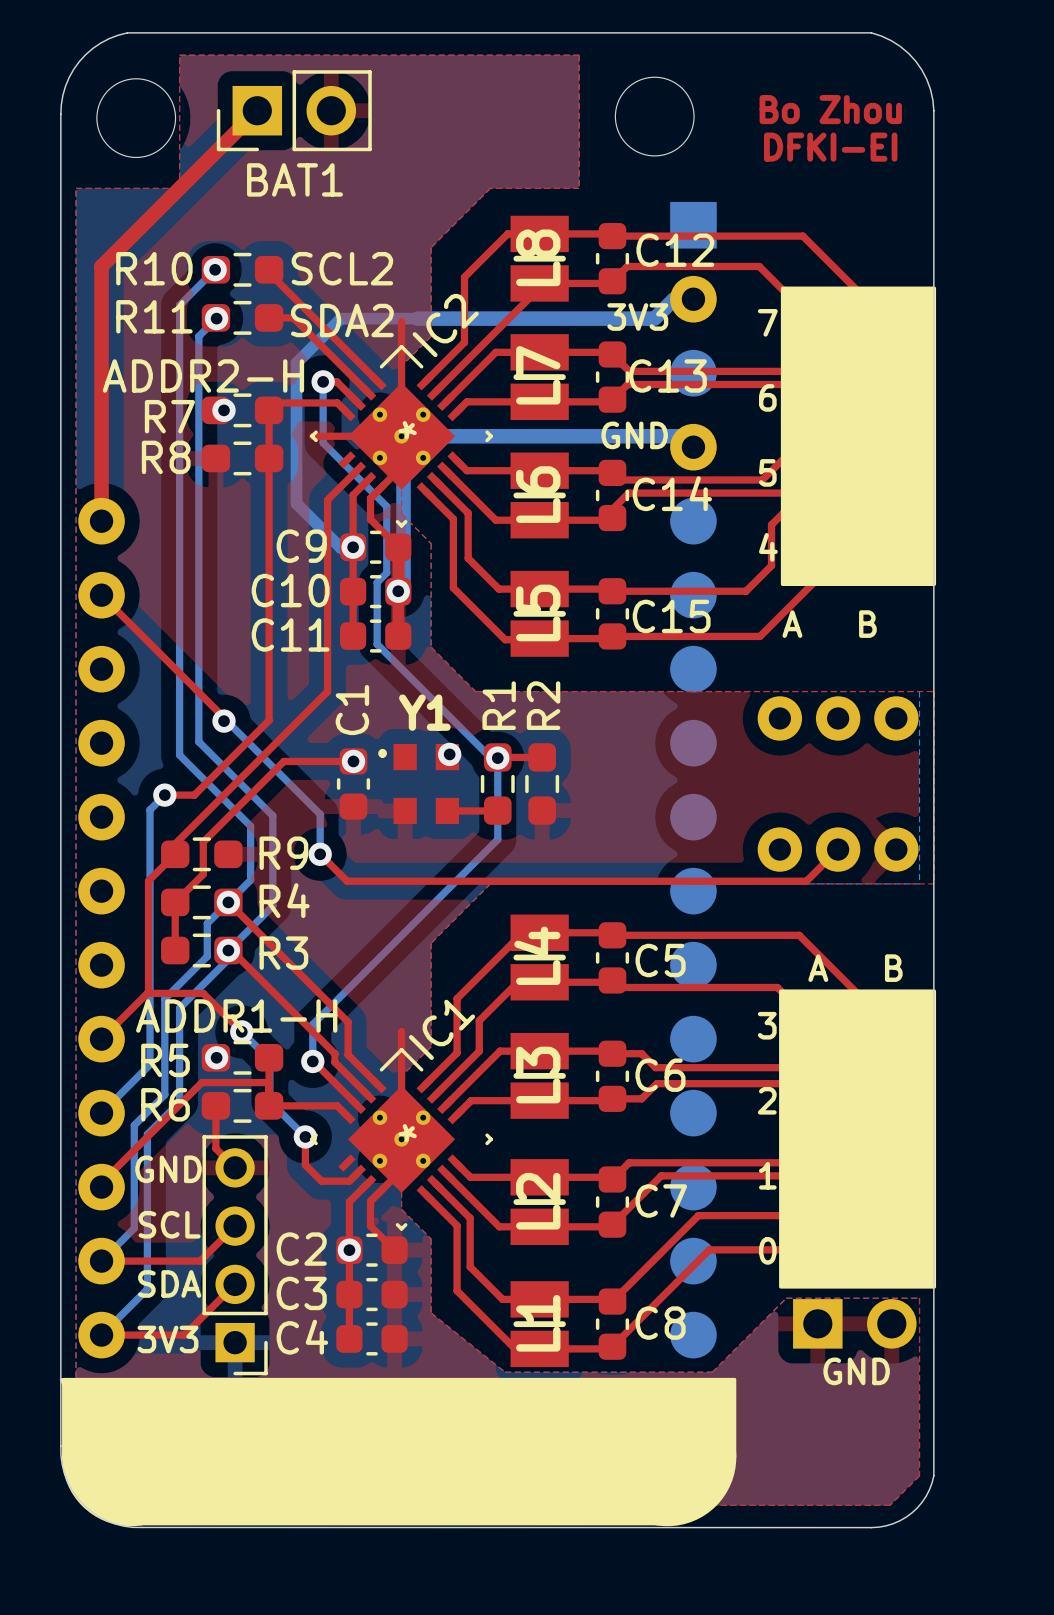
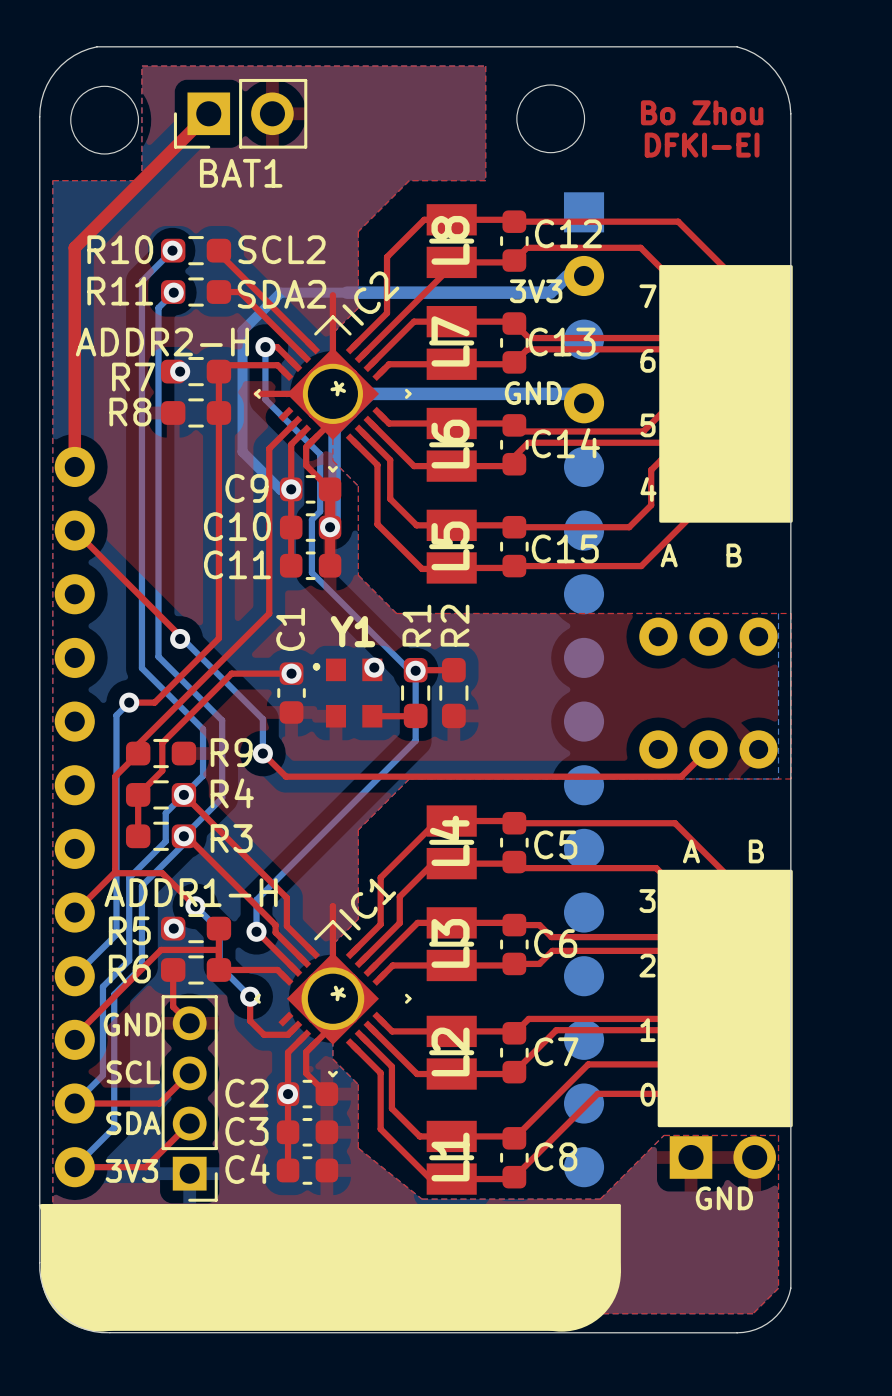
IC2 footprint: [310, 344, 493, 528] -> [254, 315, 412, 473]
IC1 footprint: [310, 1047, 493, 1231] -> [254, 920, 412, 1078]

